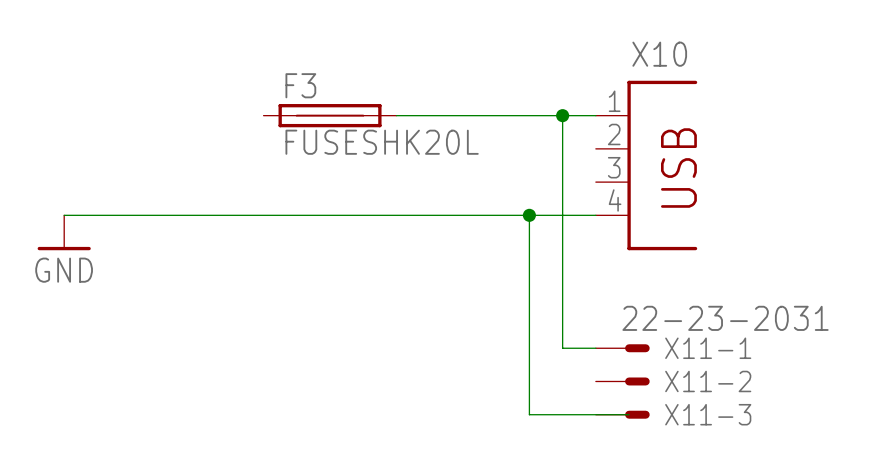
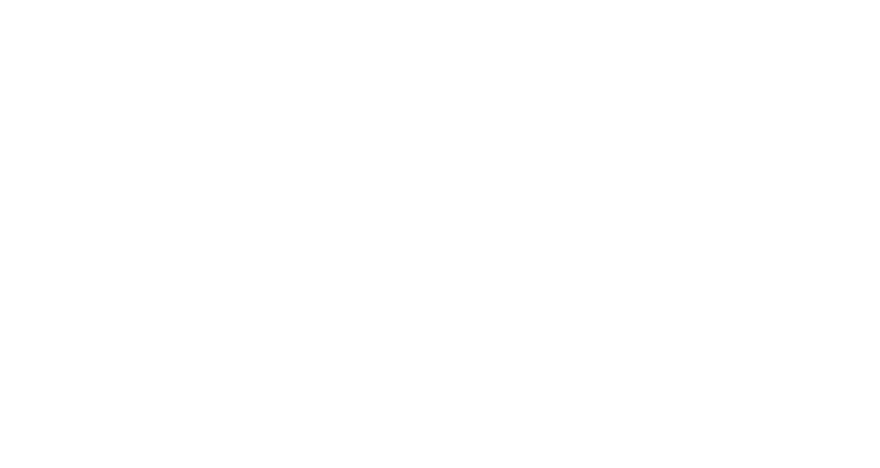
F3: FUSESHK20L (330, 115) -> none
wire: (396, 115) (595, 115) -> none
wire: (562, 115) (562, 348) (595, 348) -> none
junction: (562, 115) -> none
X10: (646, 165) -> none
wire: (64, 215) (595, 215) -> none
wire: (529, 215) (529, 414) (629, 414) -> none
junction: (529, 215) -> none
power symbol: GND (64, 232) -> none
X11-1: 22-23-2031 (622, 348) -> none
X11-2: (622, 381) -> none
X11-3: (622, 414) -> none

